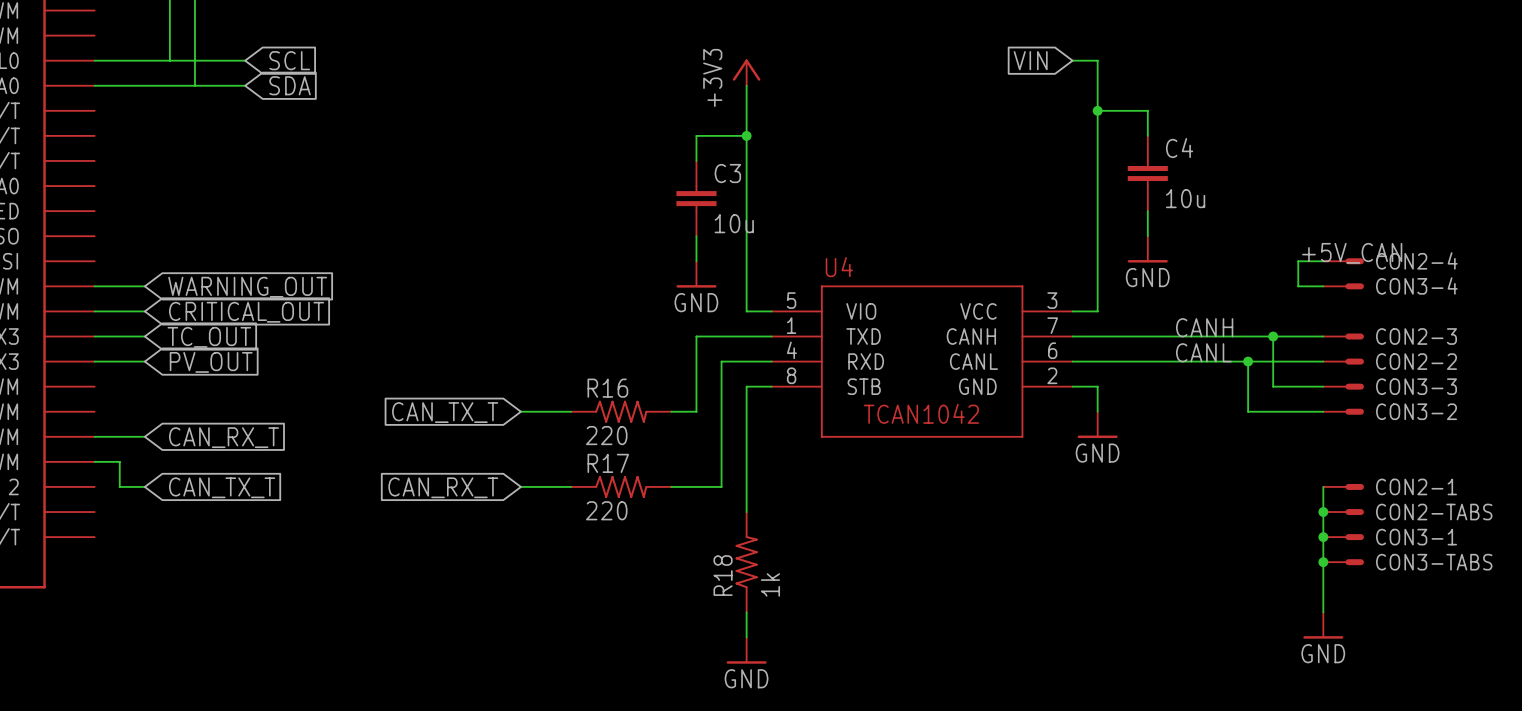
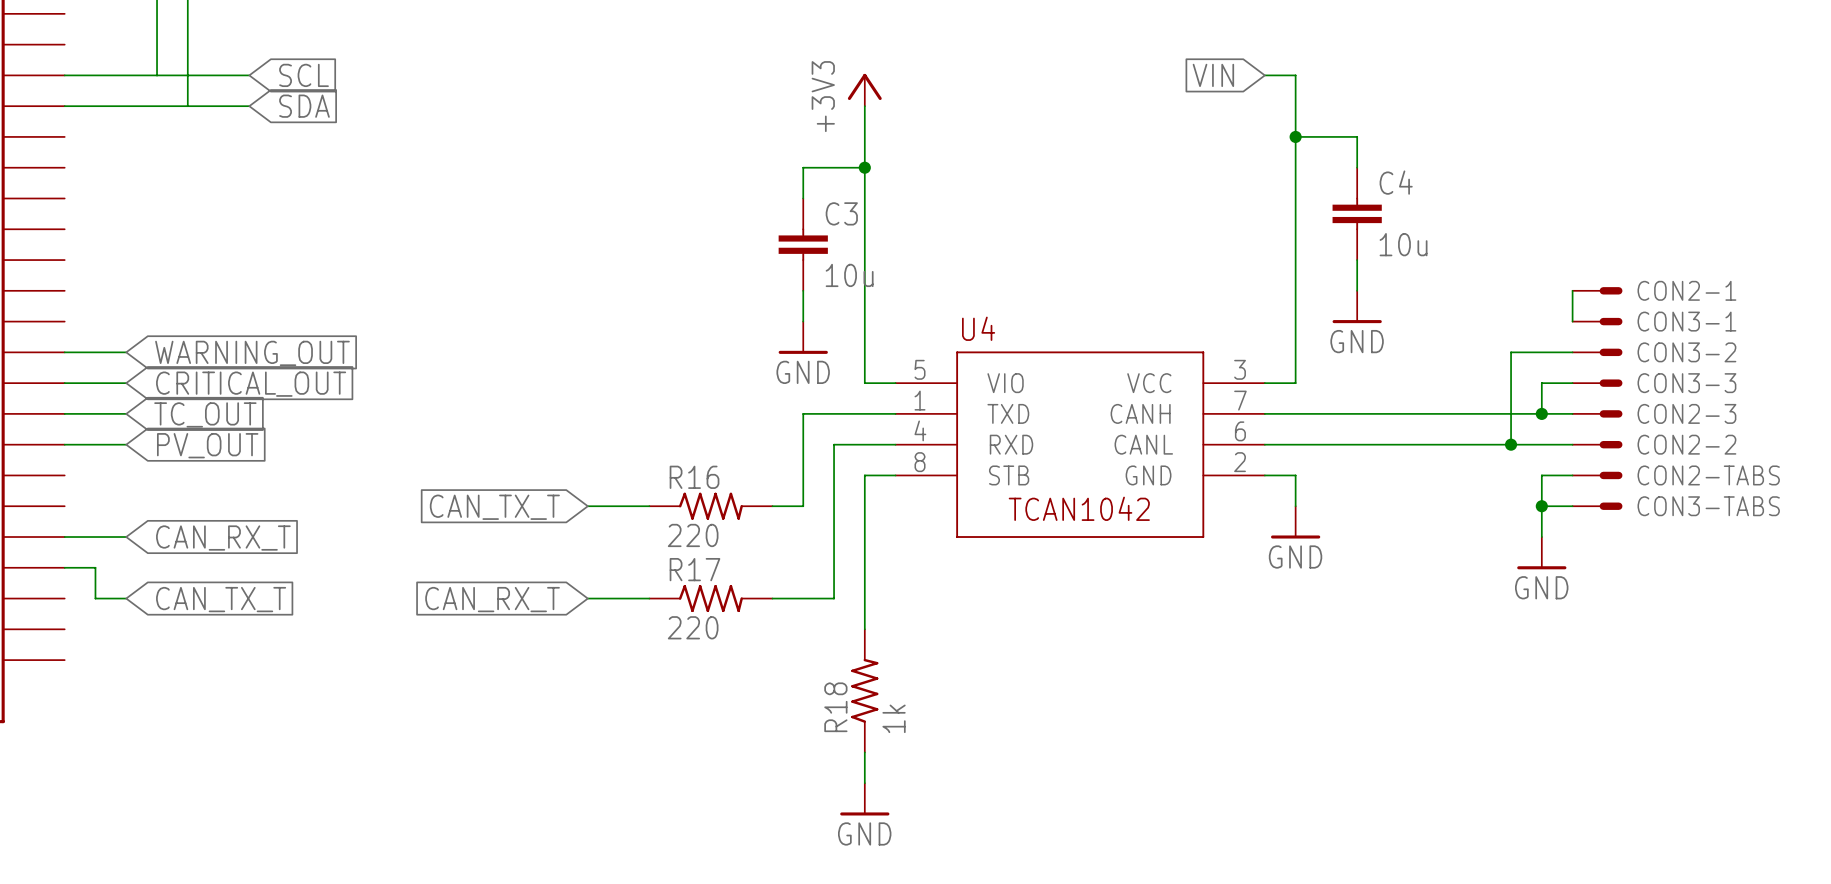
label: +5V_CAN (1352, 253) -> none
CON2-4 name: CON2-4 (1416, 260) -> CON3-1 (1686, 321)
wire: (1323, 261) (1298, 261) (1298, 286) -> (1572, 321) (1572, 290)
CON3-4 name: CON3-4 (1416, 285) -> CON3-2 (1686, 352)
wire: none -> (1541, 352) (1511, 352) (1511, 413)
wire: none -> (1572, 383) (1541, 383) (1541, 413)
CON3-3: none -> (1597, 383)
label: CANH (1204, 327) -> none
junction: (1273, 336) -> none
junction: none -> (1541, 413)
label: CANL (1203, 352) -> none
wire: (1248, 361) (1248, 411) (1298, 411) -> none
junction: (1248, 361) -> none
wire: (1273, 361) (1273, 386) (1298, 386) -> (1541, 537) (1541, 475)
junction: none -> (1511, 444)
CON3-3 name: CON3-3 (1416, 386) -> CON2-TABS (1708, 475)
junction: none -> (1541, 506)
CON3-2 name: CON3-2 (1416, 411) -> CON3-TABS (1708, 506)
wire: (1323, 486) (1323, 612) -> none
CON2-1 position: (1343, 486) -> (1597, 290)
junction: (1323, 512) -> none
CON2-TABS: (1343, 512) -> none
junction: (1323, 537) -> none
CON3-1: (1343, 537) -> none
junction: (1323, 562) -> none
CON3-TABS: (1343, 562) -> none
power symbol position: GND (1323, 625) -> GND (1541, 553)

